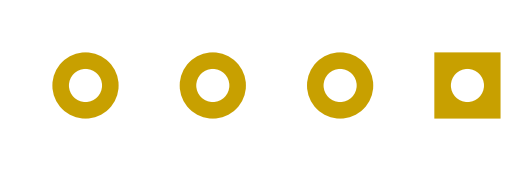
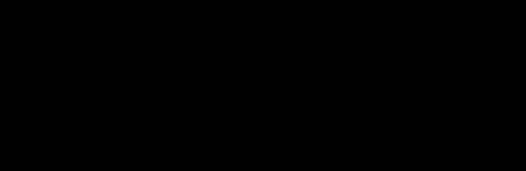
part: (276, 85) -> none

